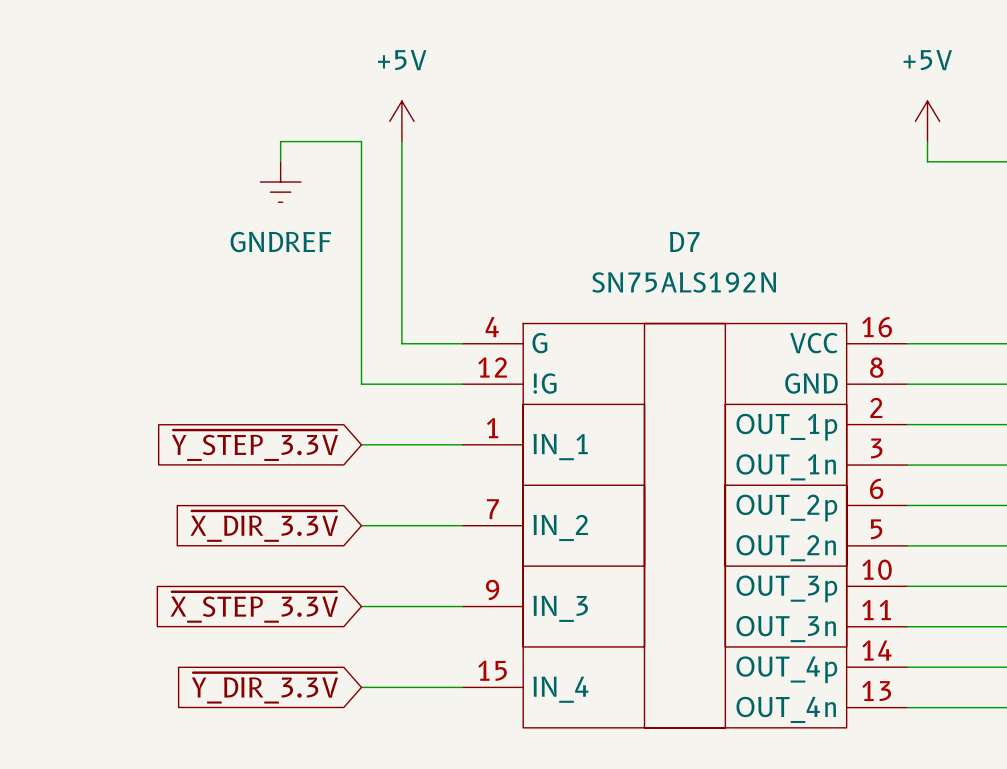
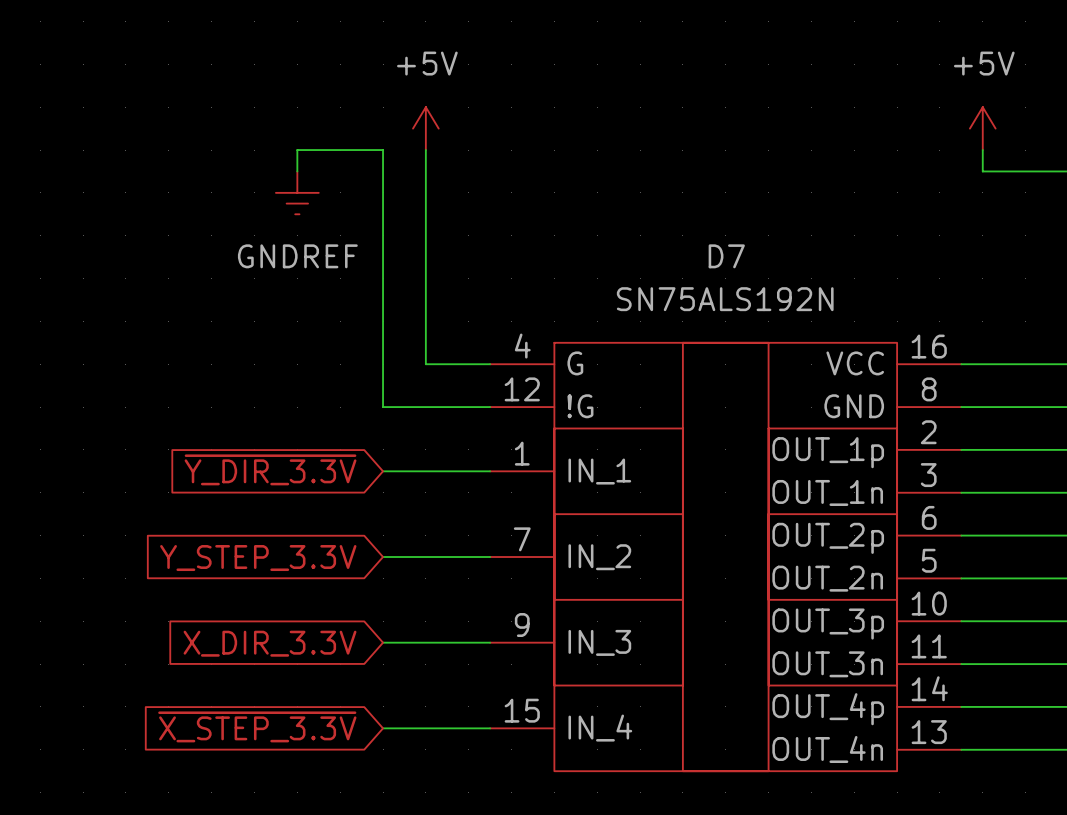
global label: ~{Y_STEP_3.3V} (254, 445) -> ~{Y_DIR_3.3V} (270, 469)
global label: ~{X_DIR_3.3V} (264, 526) -> Y_STEP_3.3V (258, 558)
global label: ~{X_STEP_3.3V} (254, 607) -> X_DIR_3.3V (270, 643)
global label: ~{Y_DIR_3.3V} (264, 688) -> ~{X_STEP_3.3V} (257, 726)

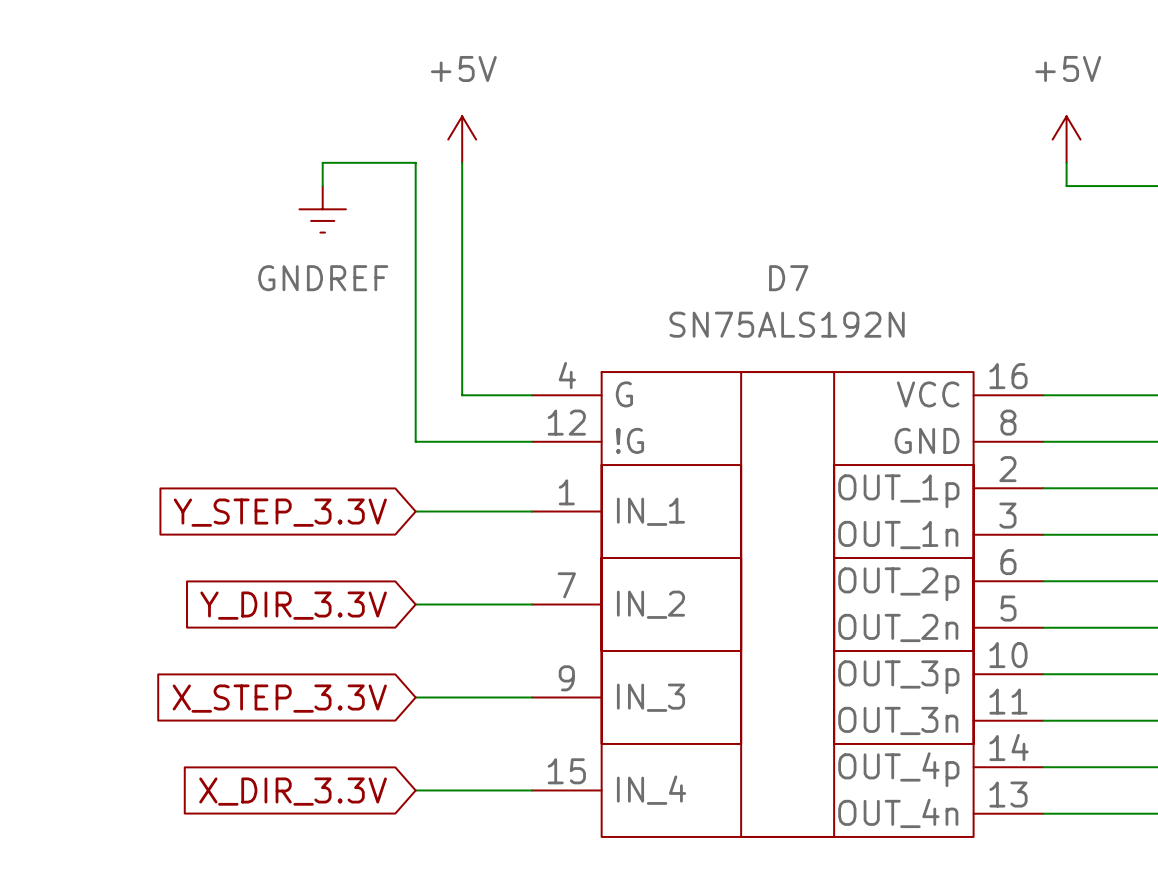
global label: ~{Y_DIR_3.3V} (270, 469) -> Y_STEP_3.3V (280, 512)
global label: Y_STEP_3.3V (258, 558) -> Y_DIR_3.3V (293, 605)
global label: X_DIR_3.3V (270, 643) -> X_STEP_3.3V (279, 698)
global label: ~{X_STEP_3.3V} (257, 726) -> X_DIR_3.3V (293, 791)

